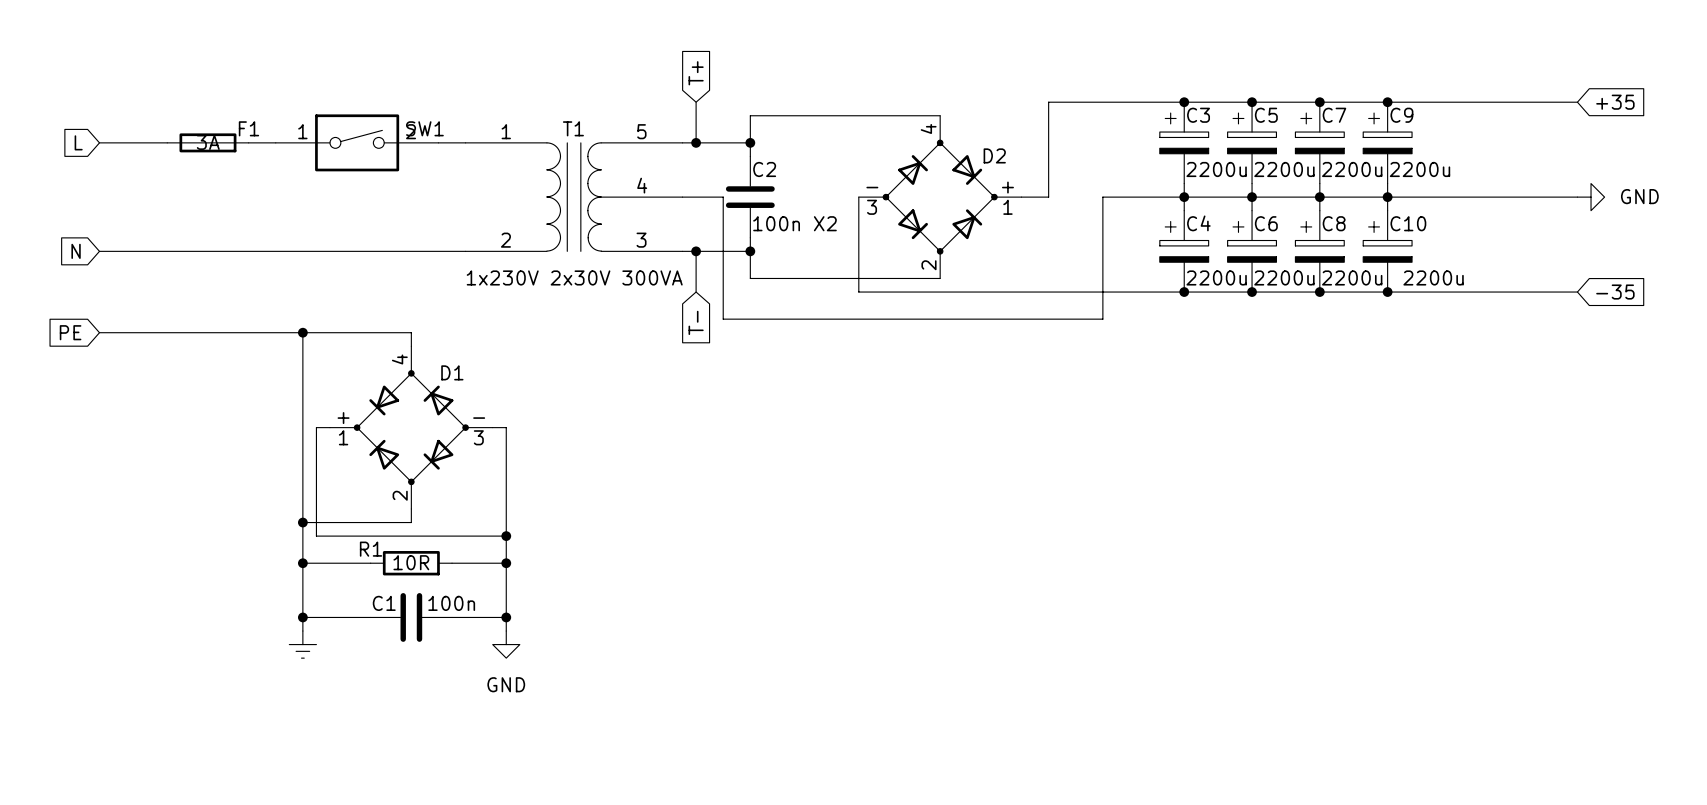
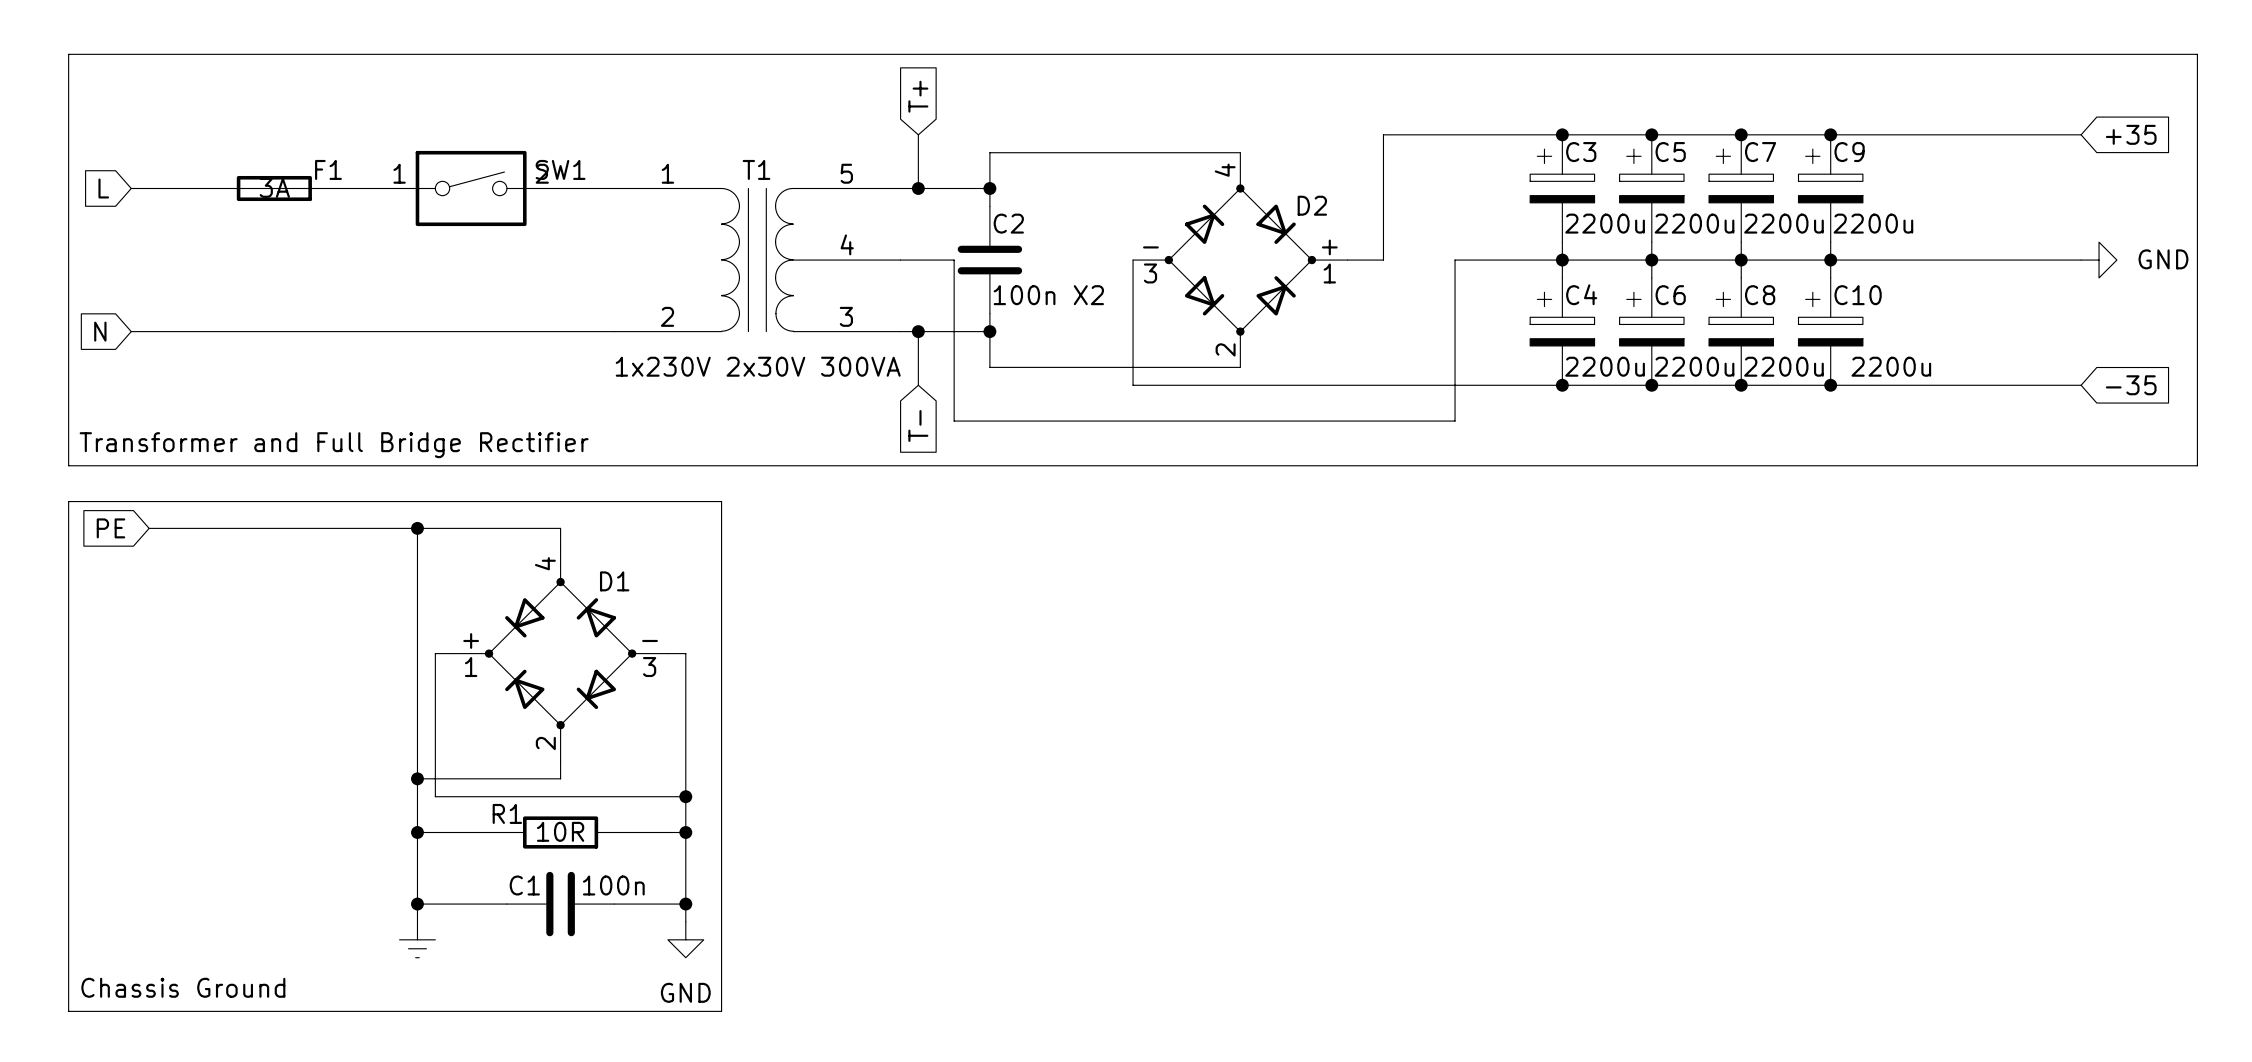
line: none -> (68, 54) (2197, 54) (2197, 465) (68, 465) (68, 54)
global label position: PE (70, 332) -> PE (110, 528)
wire: (99, 332) (411, 332) (411, 346) -> (149, 528) (560, 528) (560, 546)
wire: (302, 332) (302, 631) -> none
junction: (302, 332) -> none
text: none -> Transformer and Full Bridge Rectifier (334, 445)
line: none -> (68, 501) (68, 1011) (721, 1011) (721, 501) (68, 501)
junction: none -> (417, 528)
wire: (316, 427) (329, 427) -> (417, 564) (417, 528)
D1 position: (411, 427) -> (560, 653)
wire: (492, 427) (506, 427) (506, 631) -> (667, 653) (685, 653) (685, 921)
wire: none -> (453, 653) (435, 653) (435, 796) (685, 796)
wire: (411, 508) (411, 522) (302, 522) -> (560, 760) (560, 778) (417, 778)
junction: (302, 522) -> none
wire: (316, 536) (506, 536) -> (417, 707) (417, 921)
junction: (506, 536) -> none
wire: (302, 563) (370, 563) -> (417, 832) (506, 832)
junction: (302, 563) -> none
R1 position: (411, 563) -> (560, 832)
wire: (452, 563) (506, 563) -> (614, 832) (685, 832)
junction: (506, 563) -> none
junction: none -> (417, 778)
junction: none -> (685, 796)
wire: (302, 617) (370, 617) -> (417, 904) (506, 904)
junction: (302, 617) -> none
C1 position: (411, 617) -> (560, 904)
wire: (452, 617) (506, 617) -> (614, 904) (685, 904)
junction: (506, 617) -> none
junction: none -> (417, 832)
junction: none -> (685, 832)
power symbol position: (302, 644) -> (417, 939)
power symbol position: GND (506, 644) -> GND (685, 939)
junction: none -> (417, 904)
junction: none -> (685, 904)
text: none -> Chassis Ground (183, 987)

